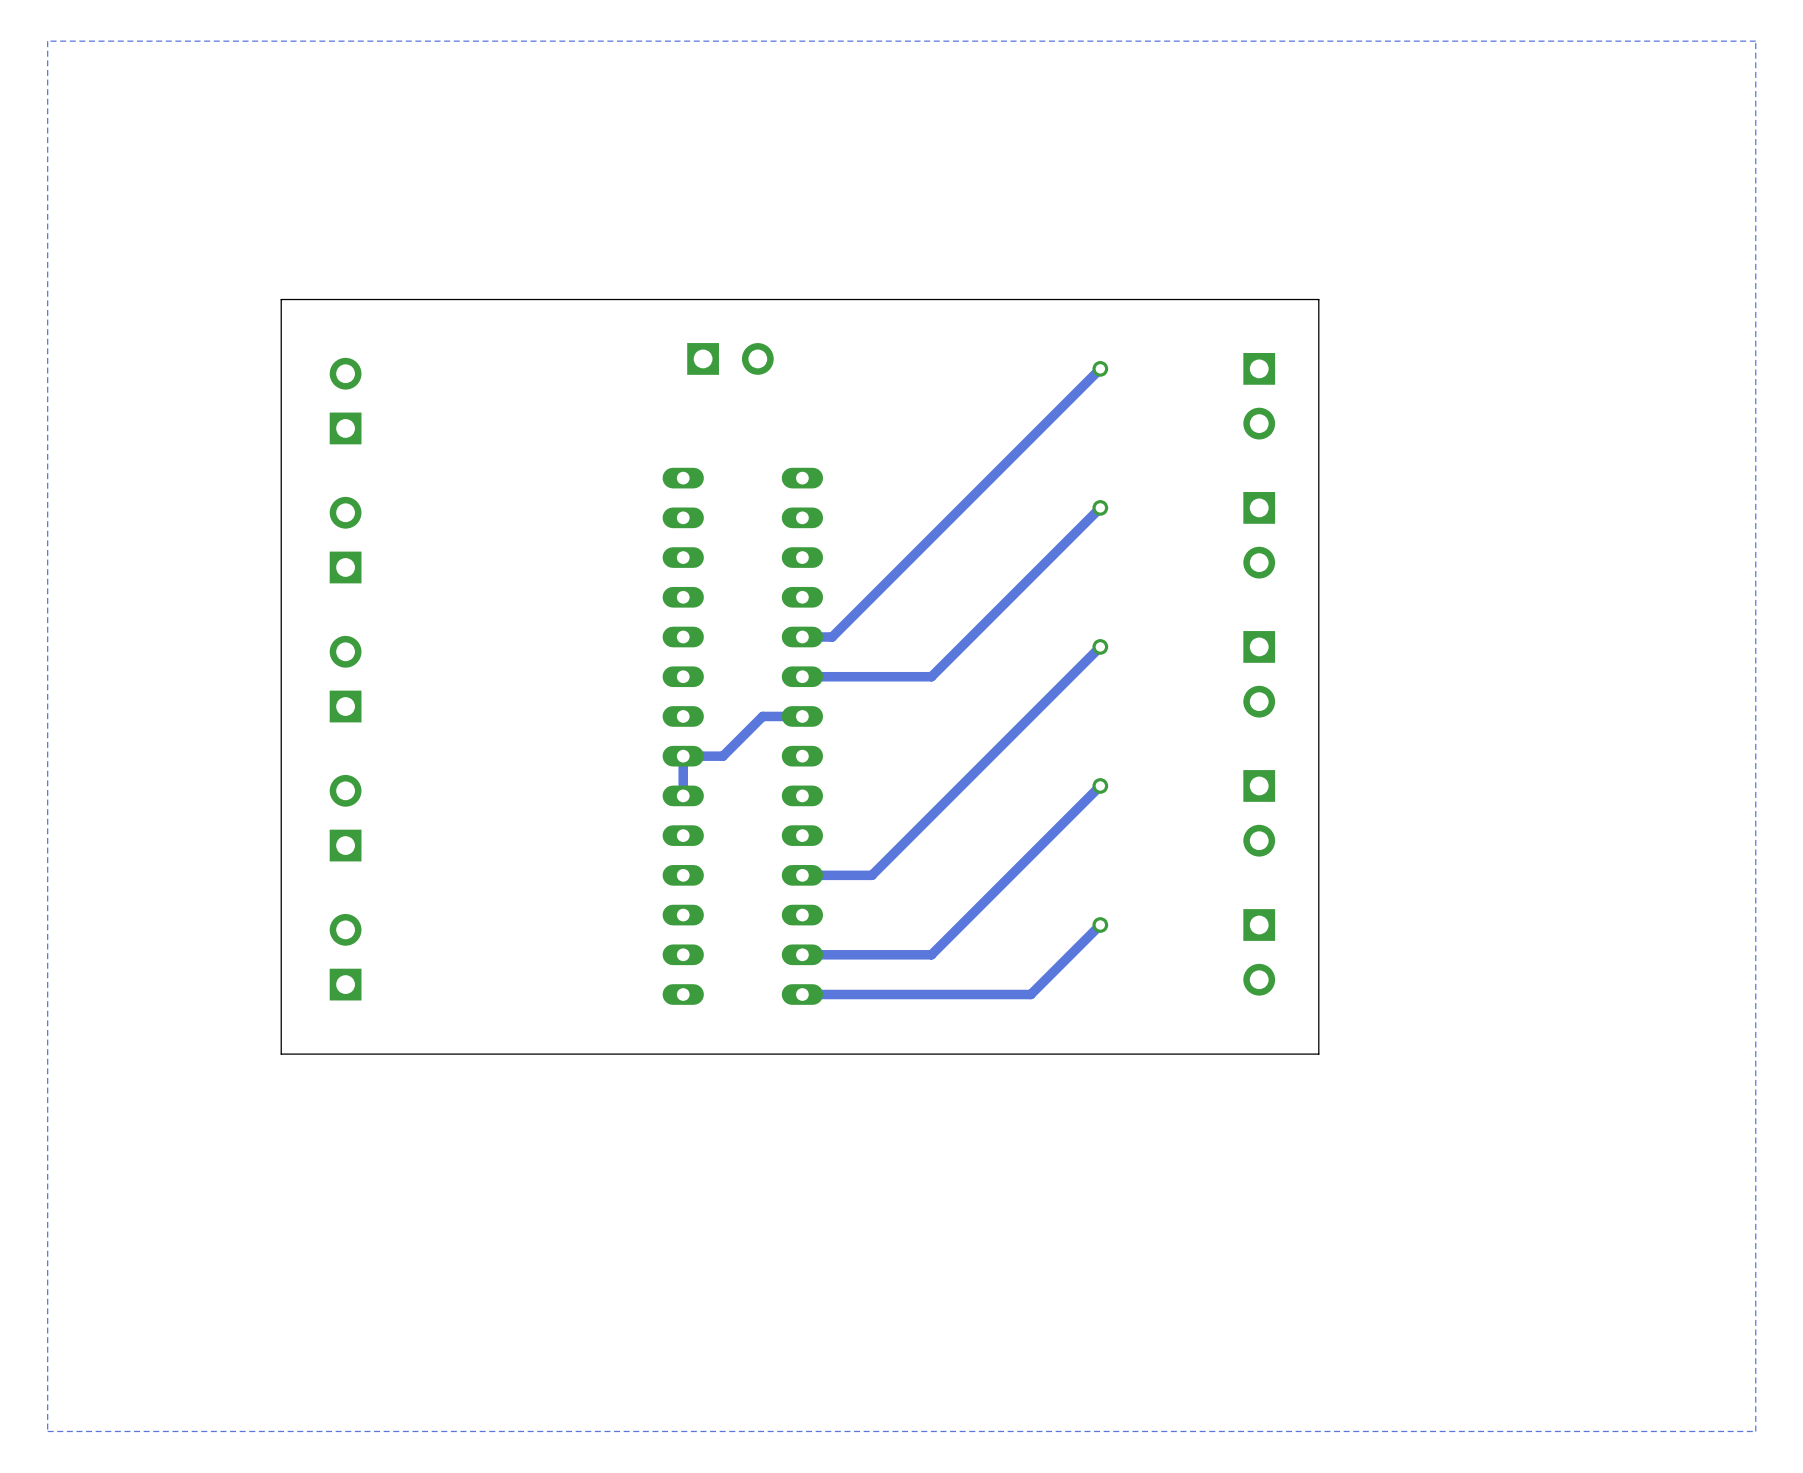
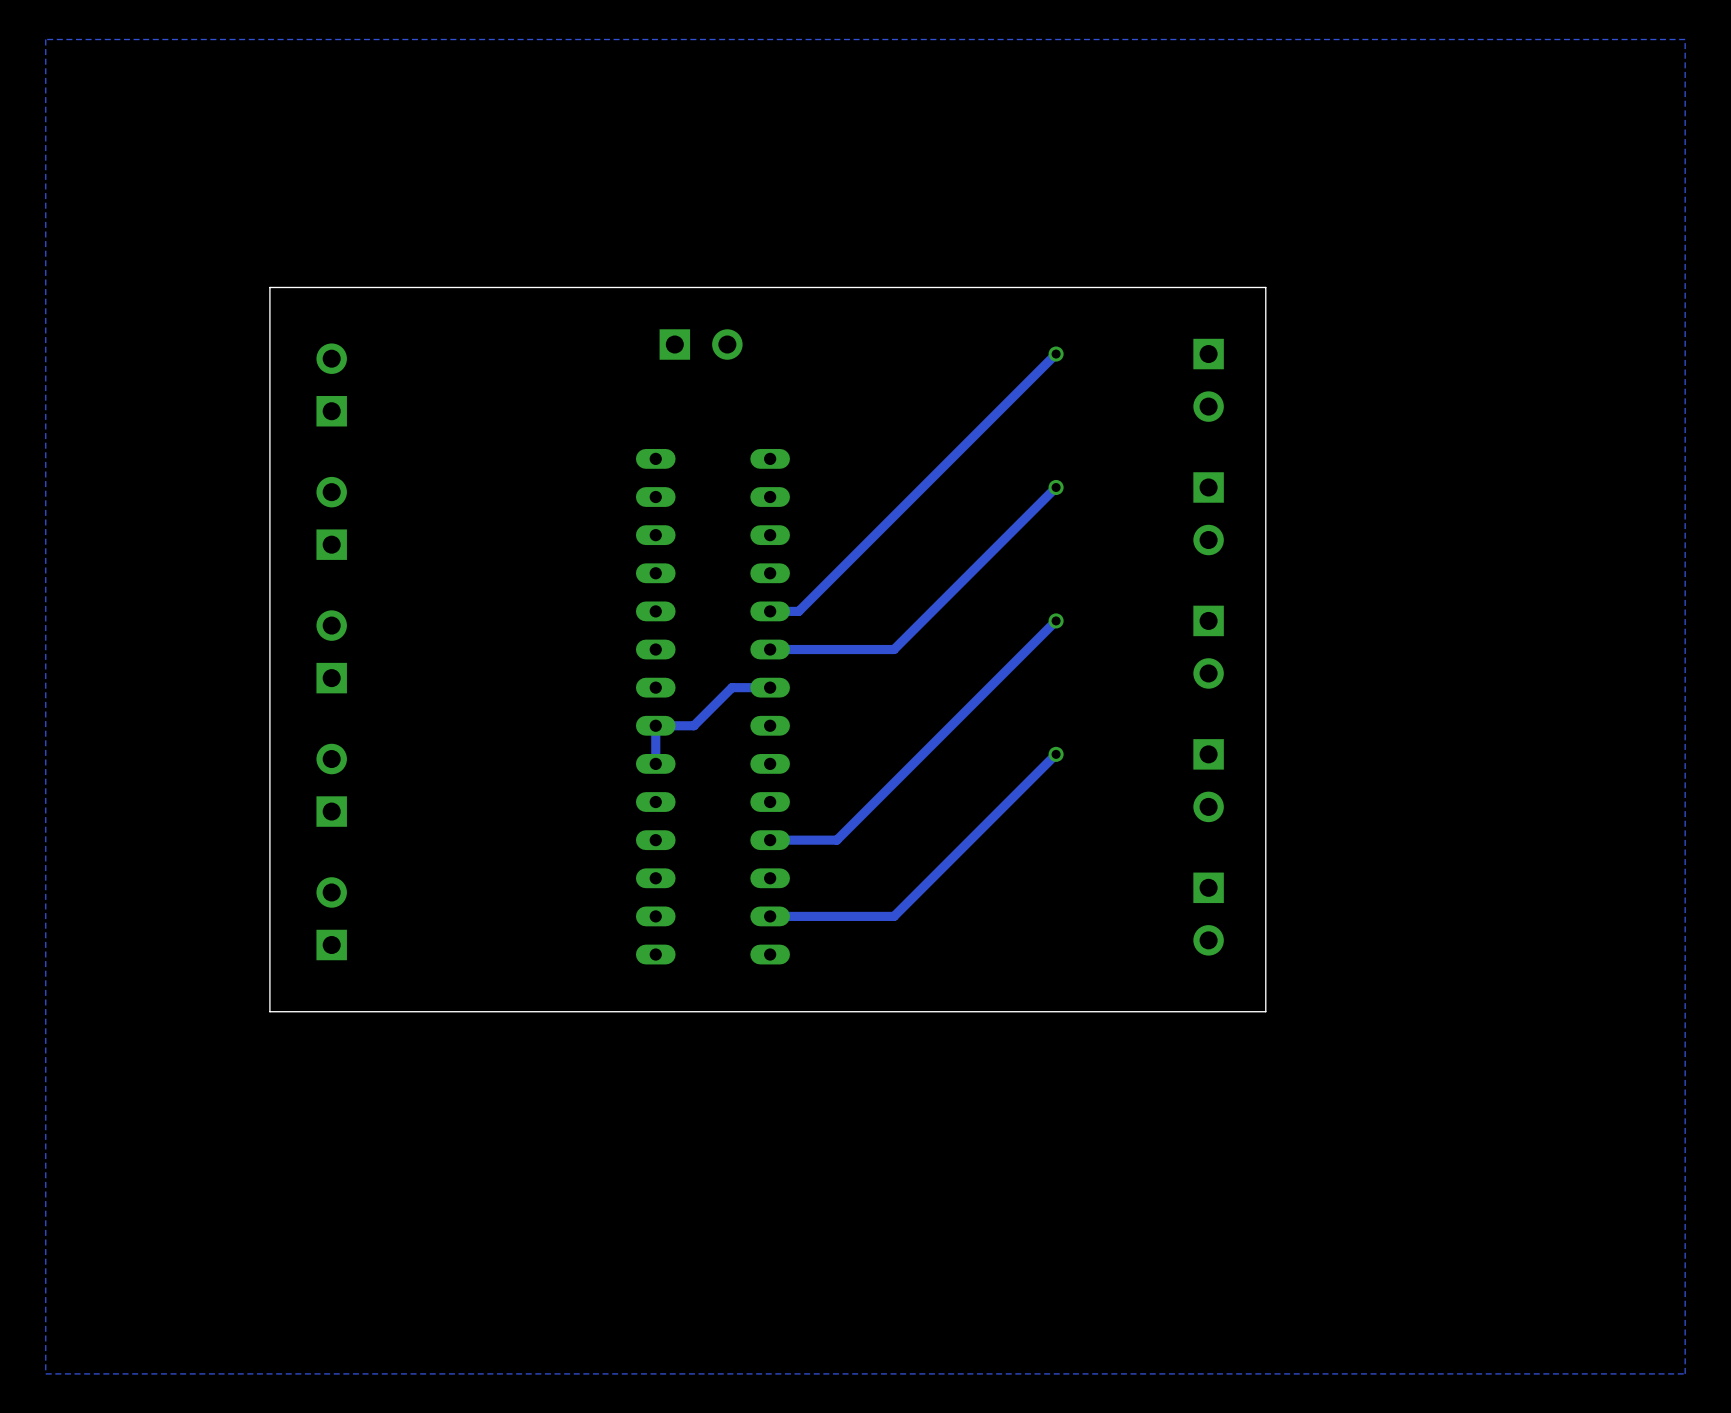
track: (1100, 925) (1030, 994) (802, 994) -> none
via: (1100, 925) -> none

